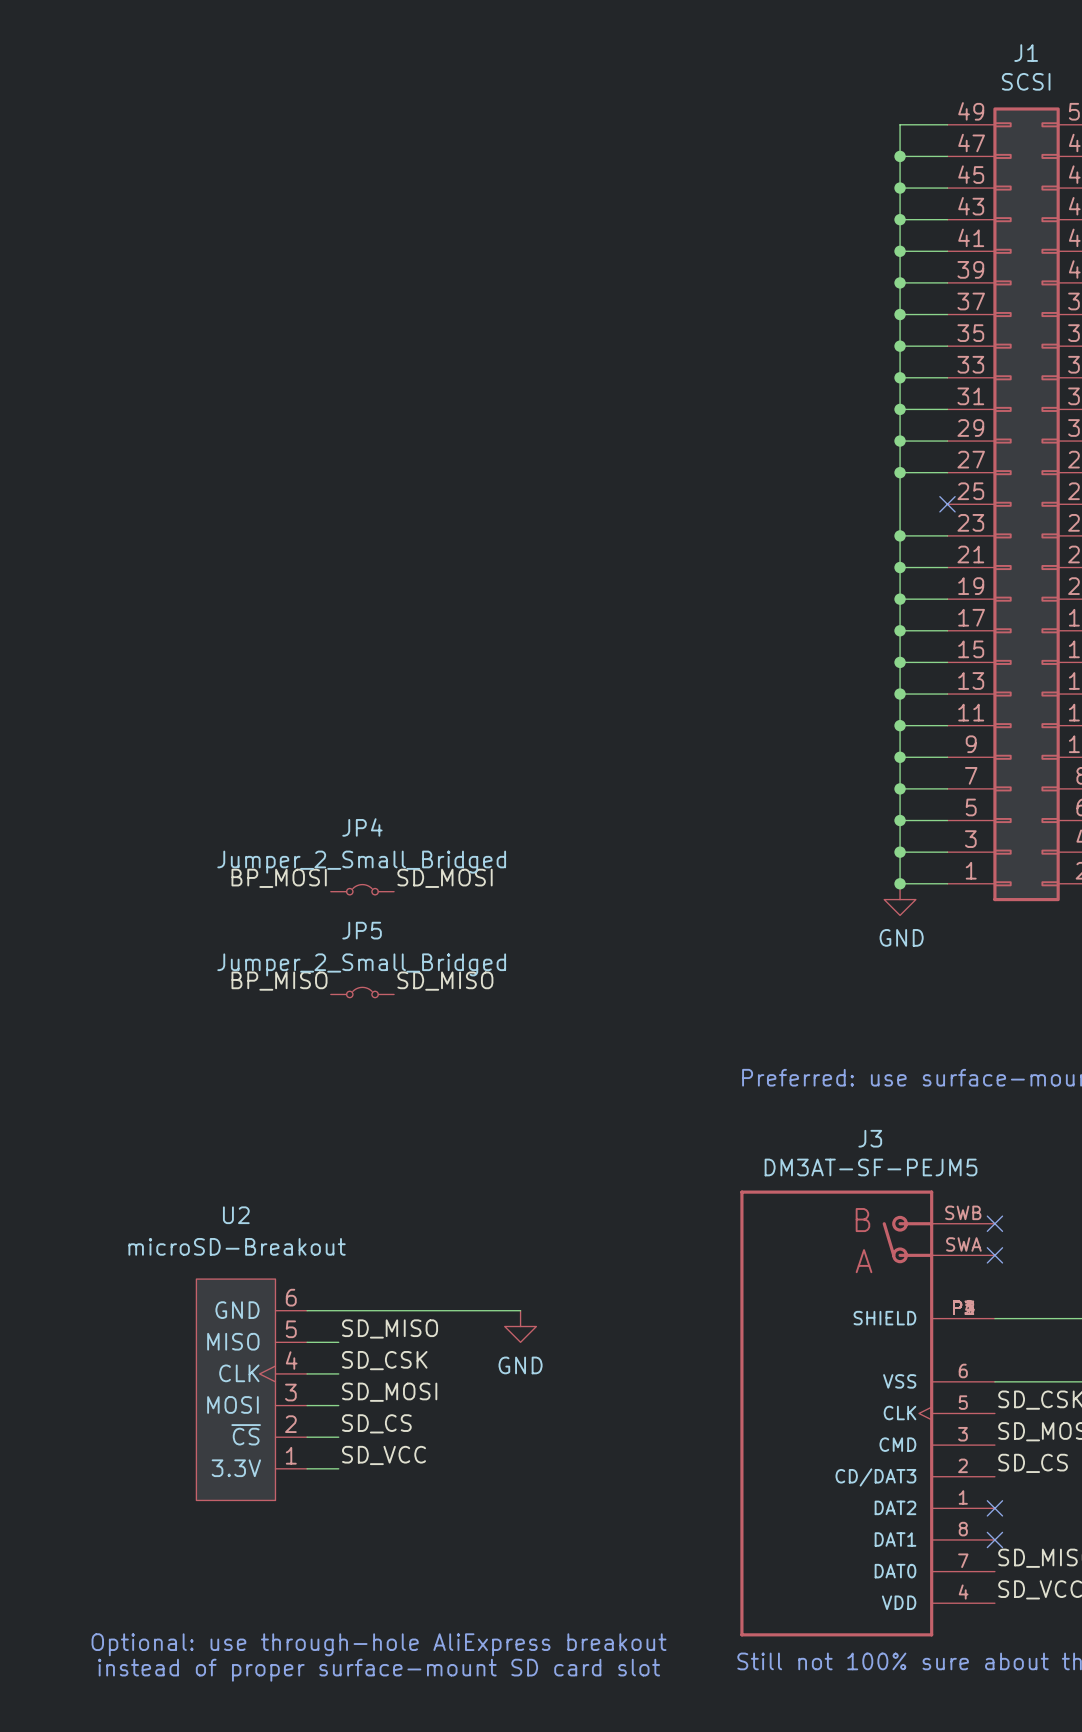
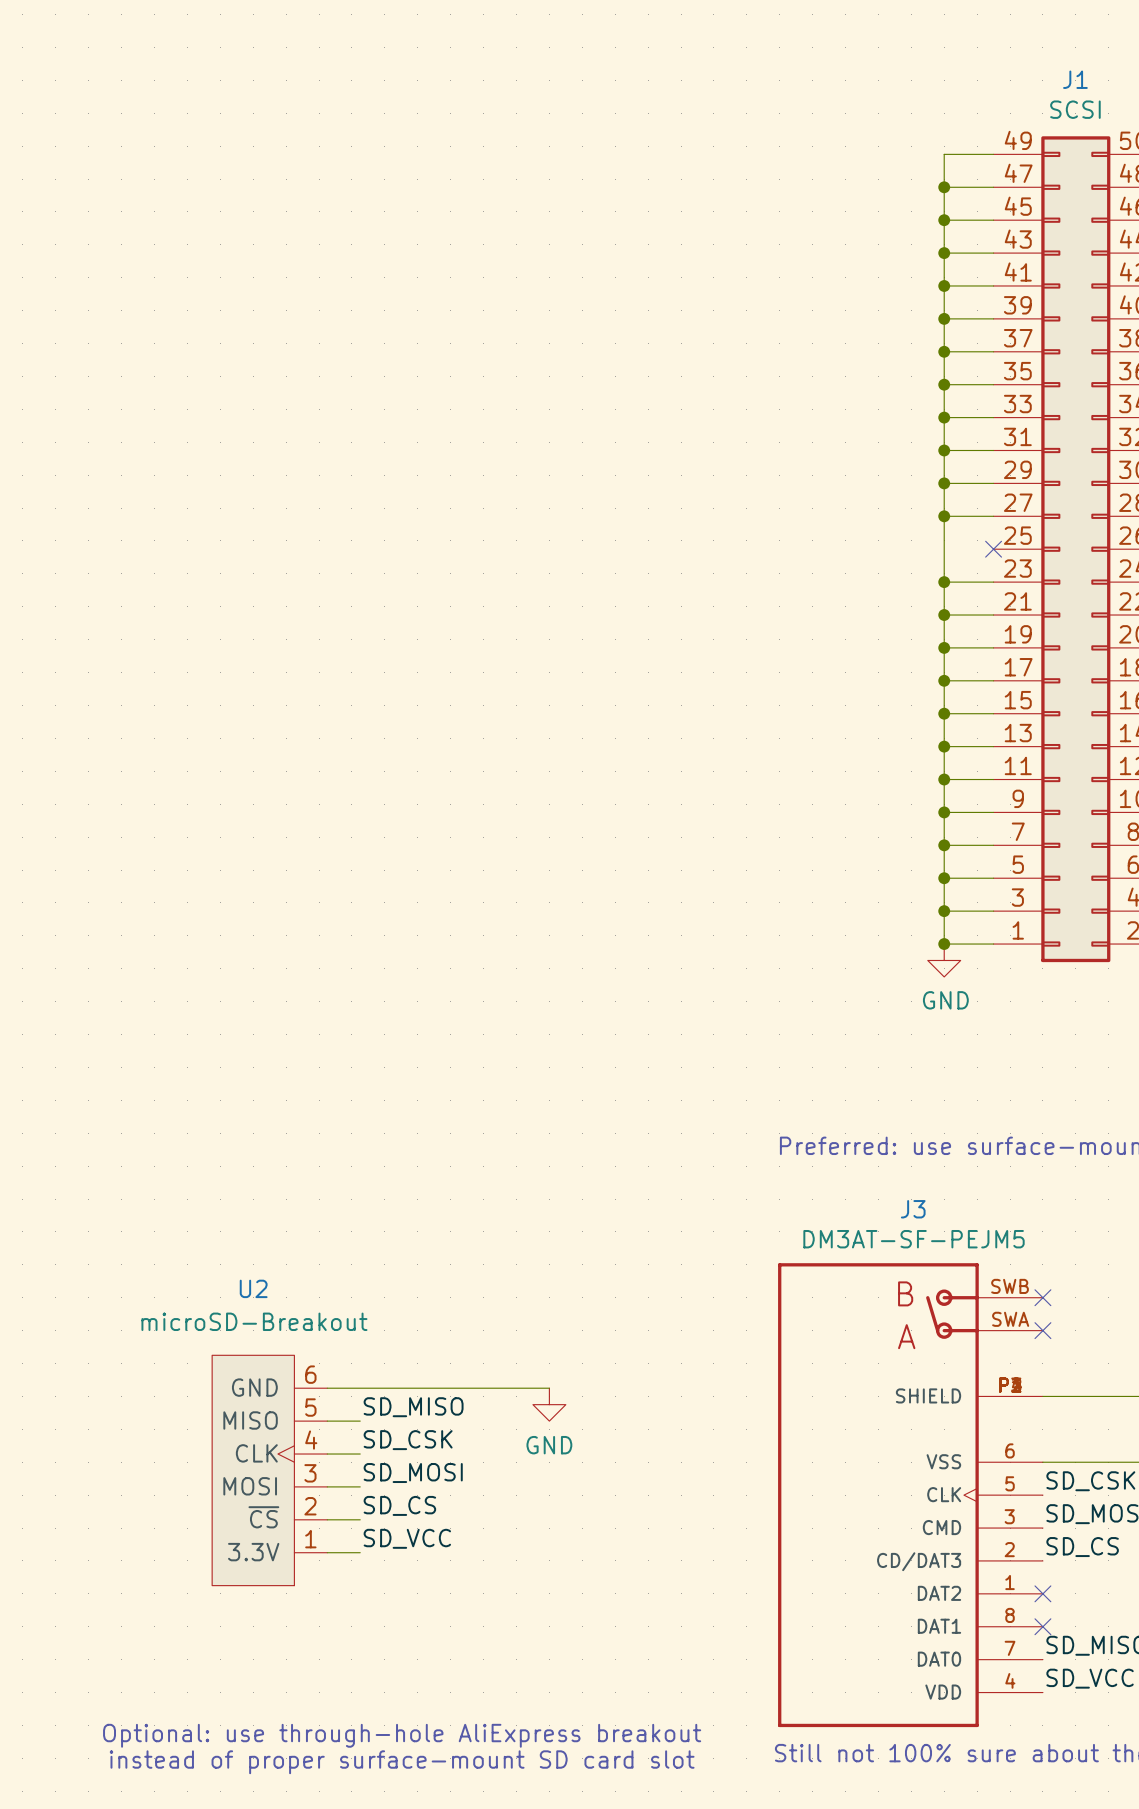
label: BP_MOSI (279, 878) -> none
label: SD_MOSI (445, 878) -> none
JP4: Jumper_2_Small_Bridged (362, 889) -> none
label: BP_MISO (279, 981) -> none
label: SD_MISO (445, 981) -> none
JP5: Jumper_2_Small_Bridged (362, 992) -> none

